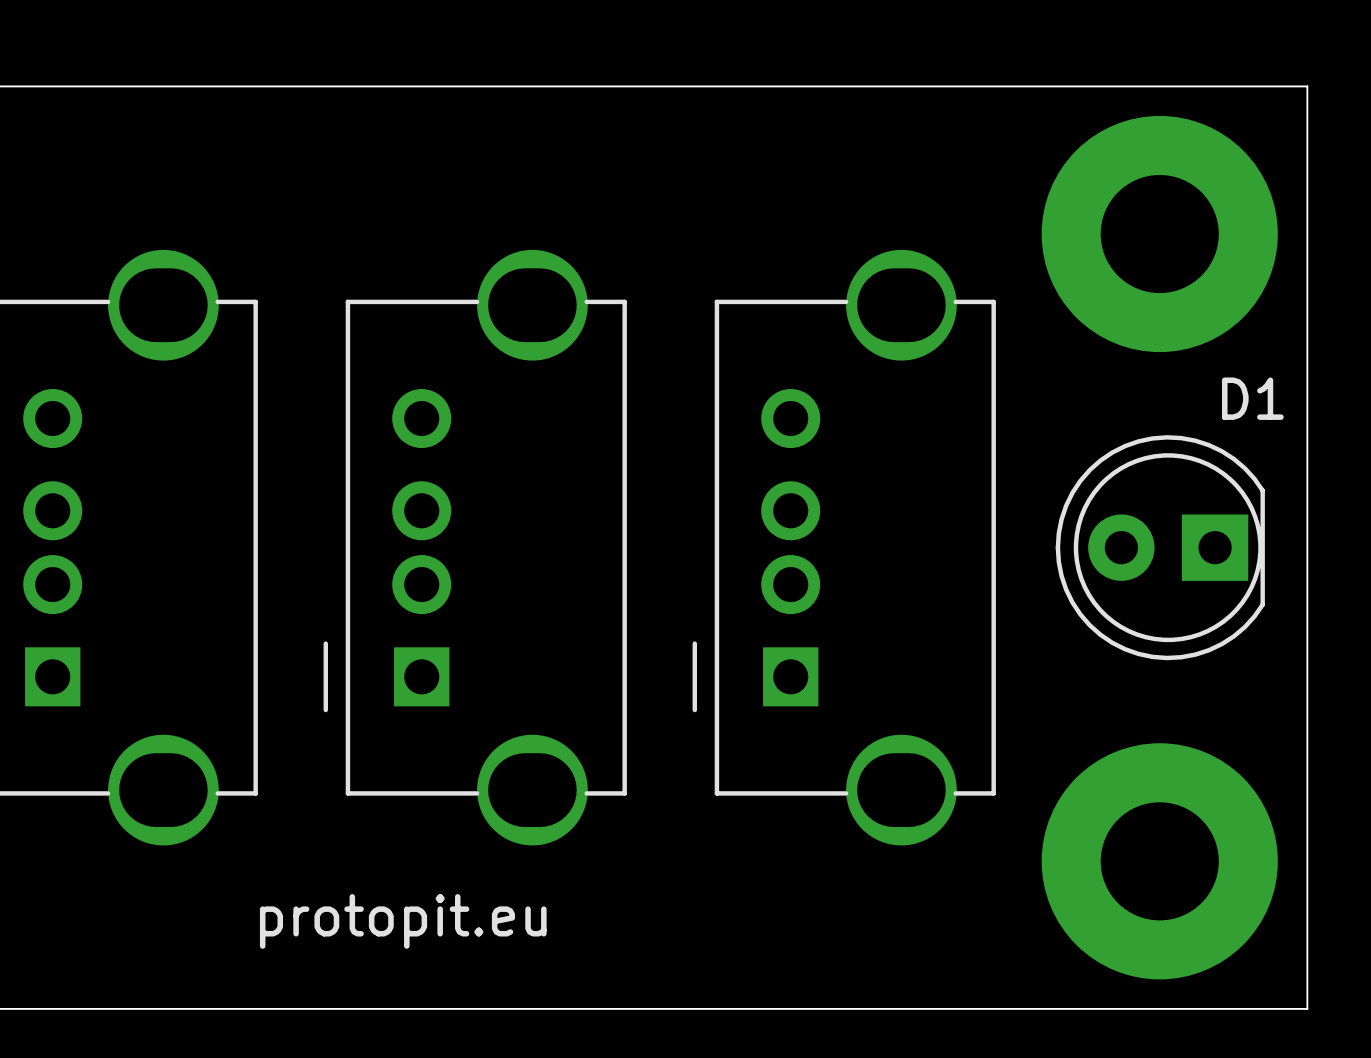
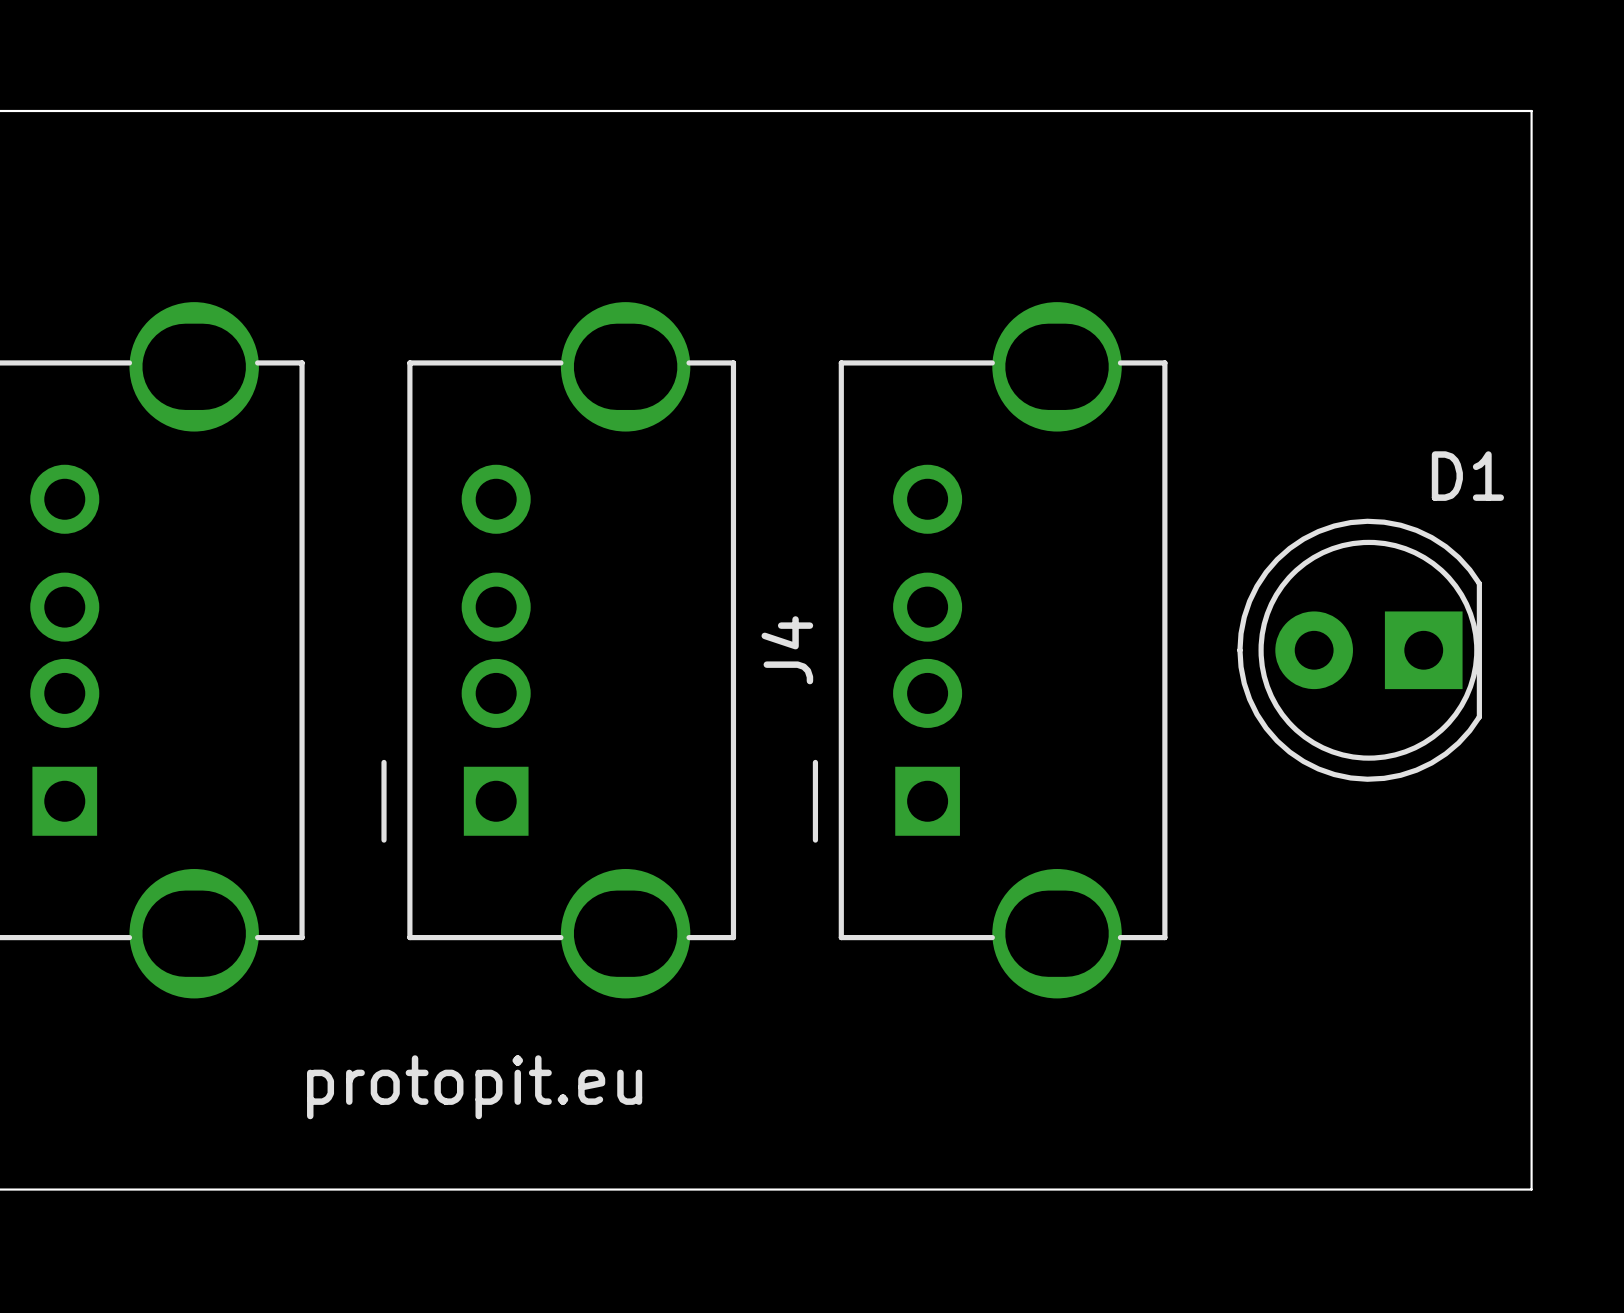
part: (1159, 234) -> none
J4 name: none -> J4 (787, 650)
part: (1159, 861) -> none

